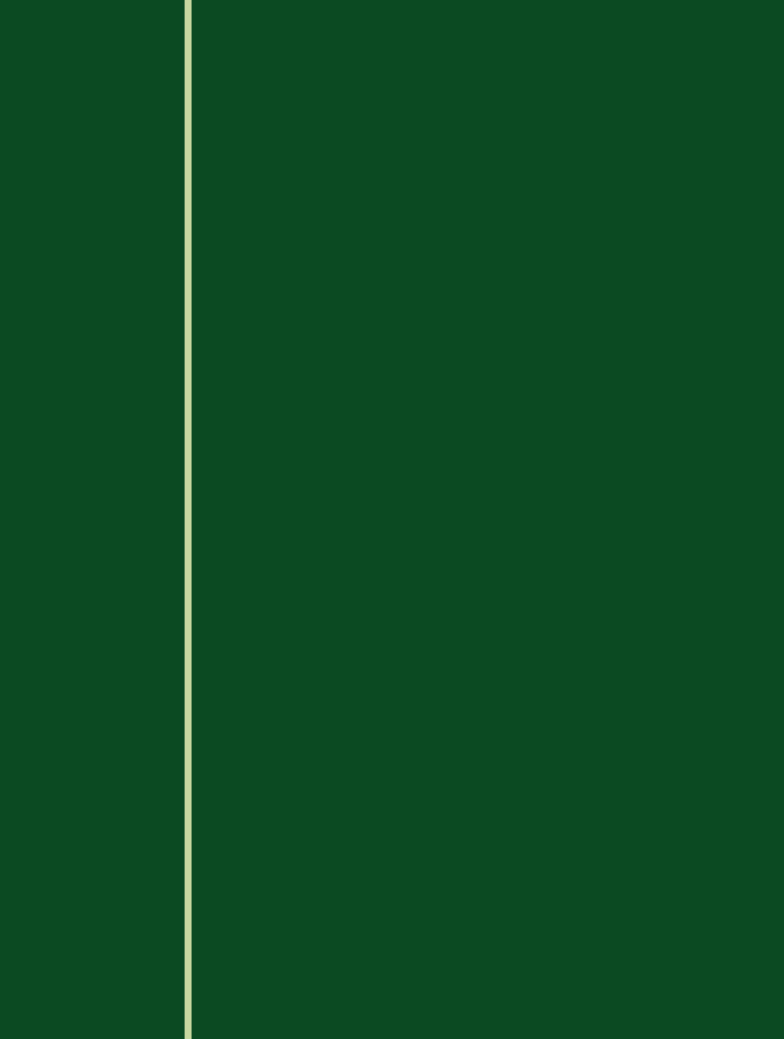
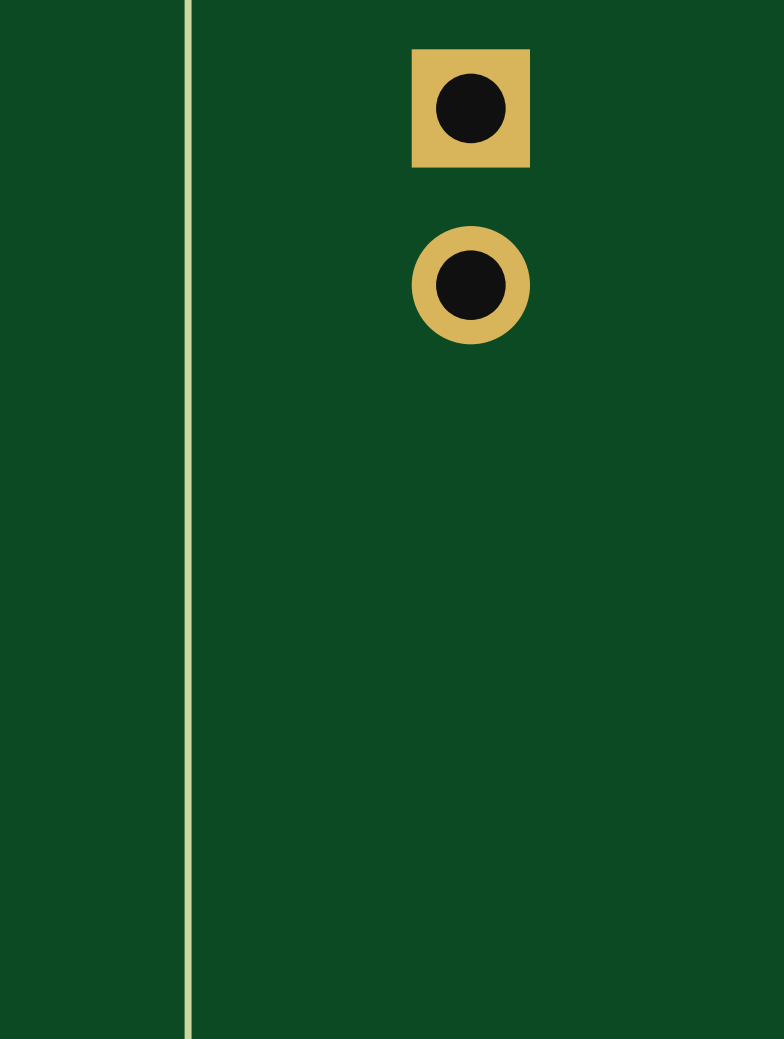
part: none -> (470, 196)

